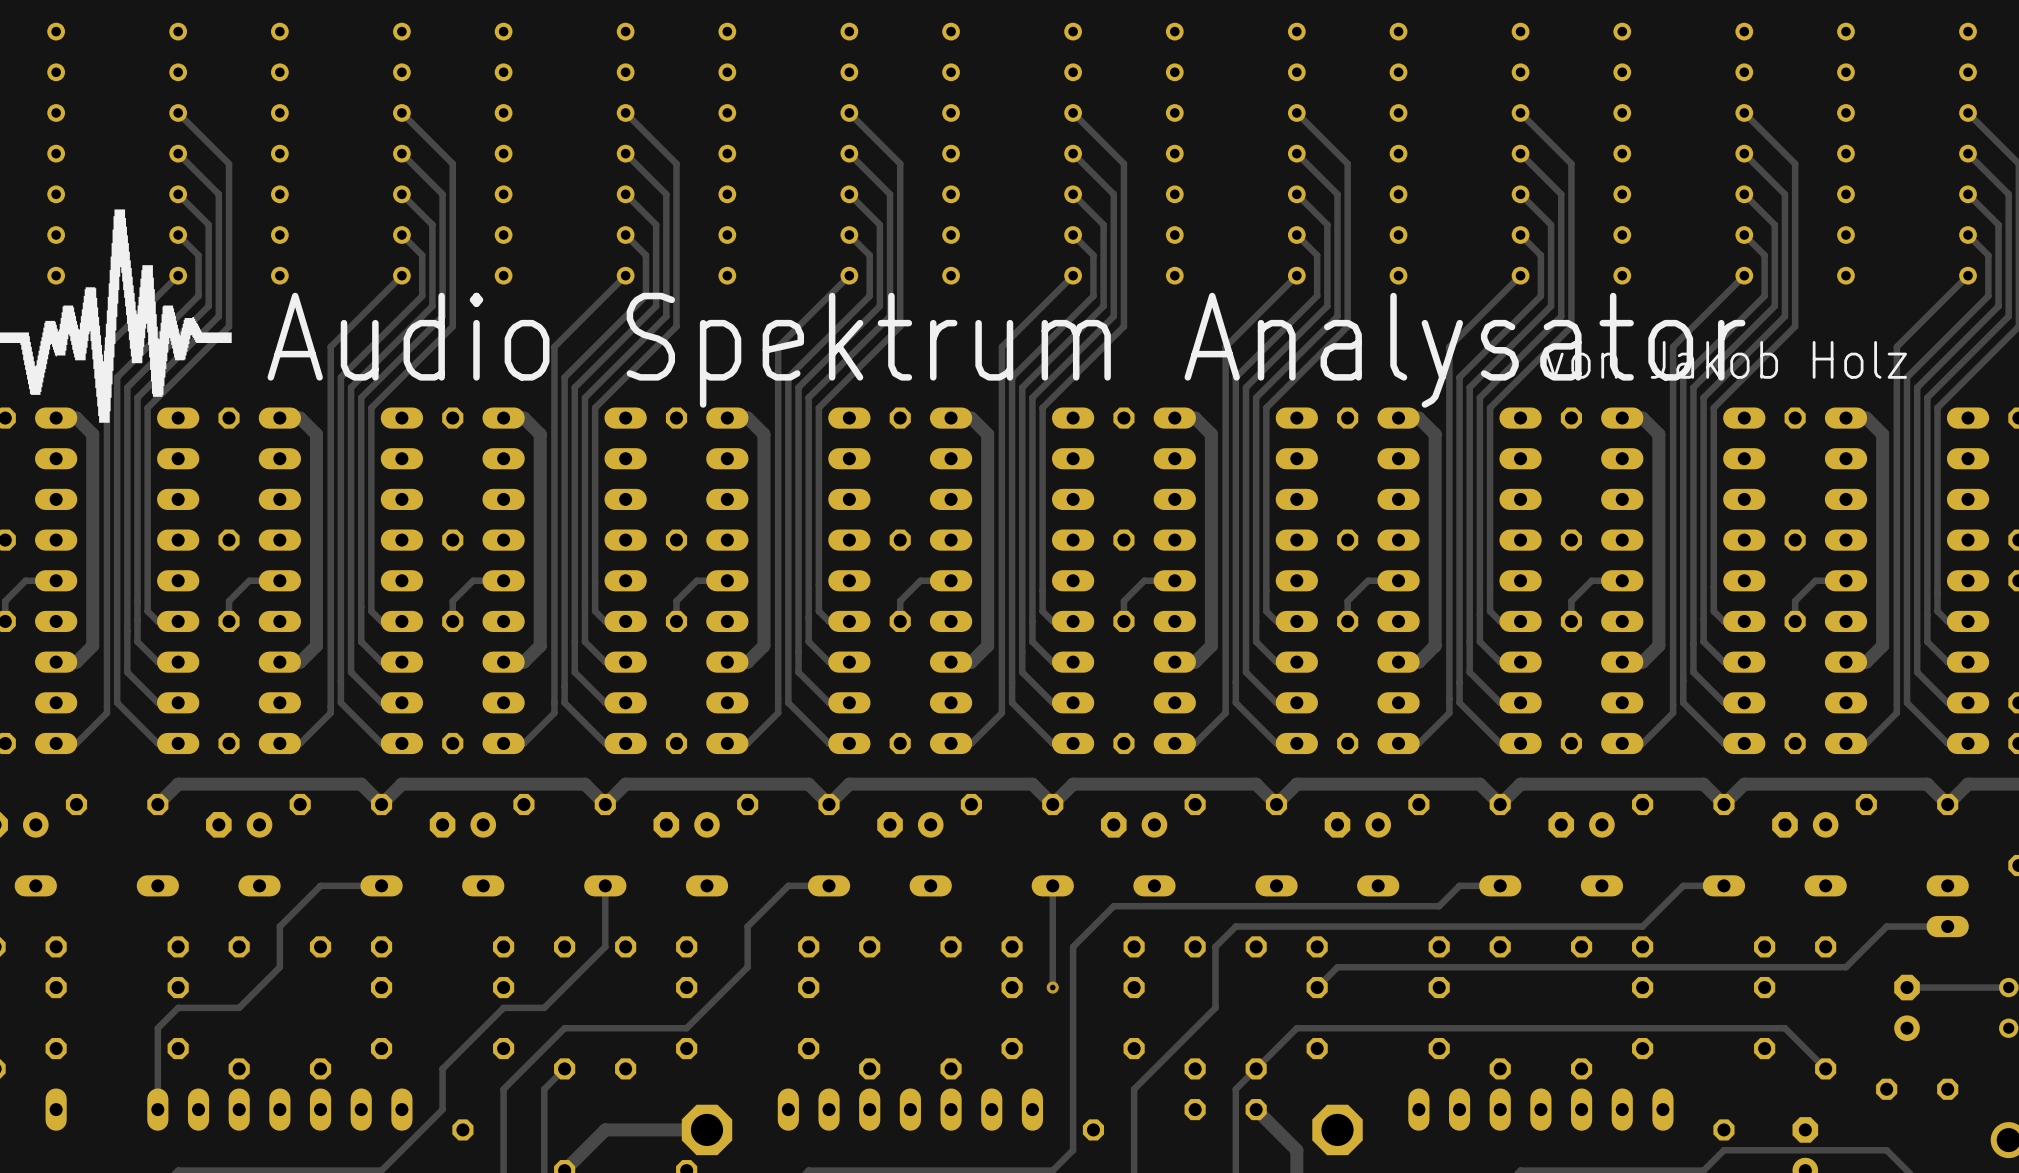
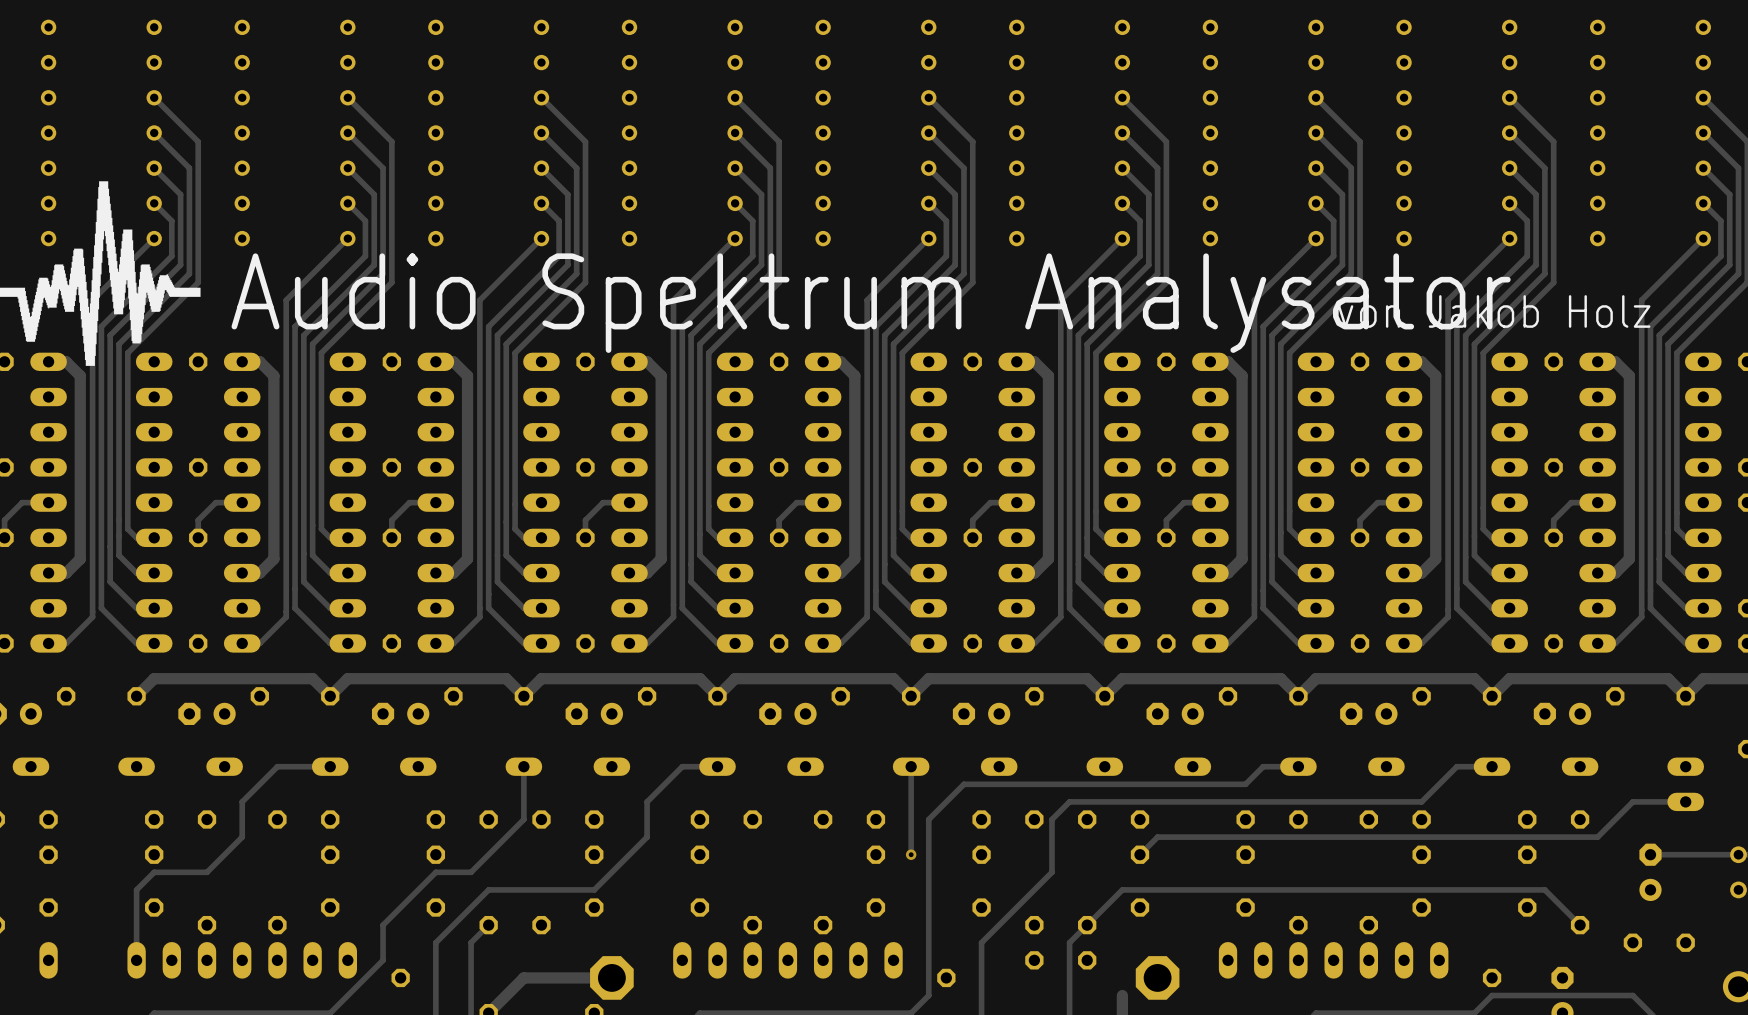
track: (1256, 1109) (1296, 1150) -> none

